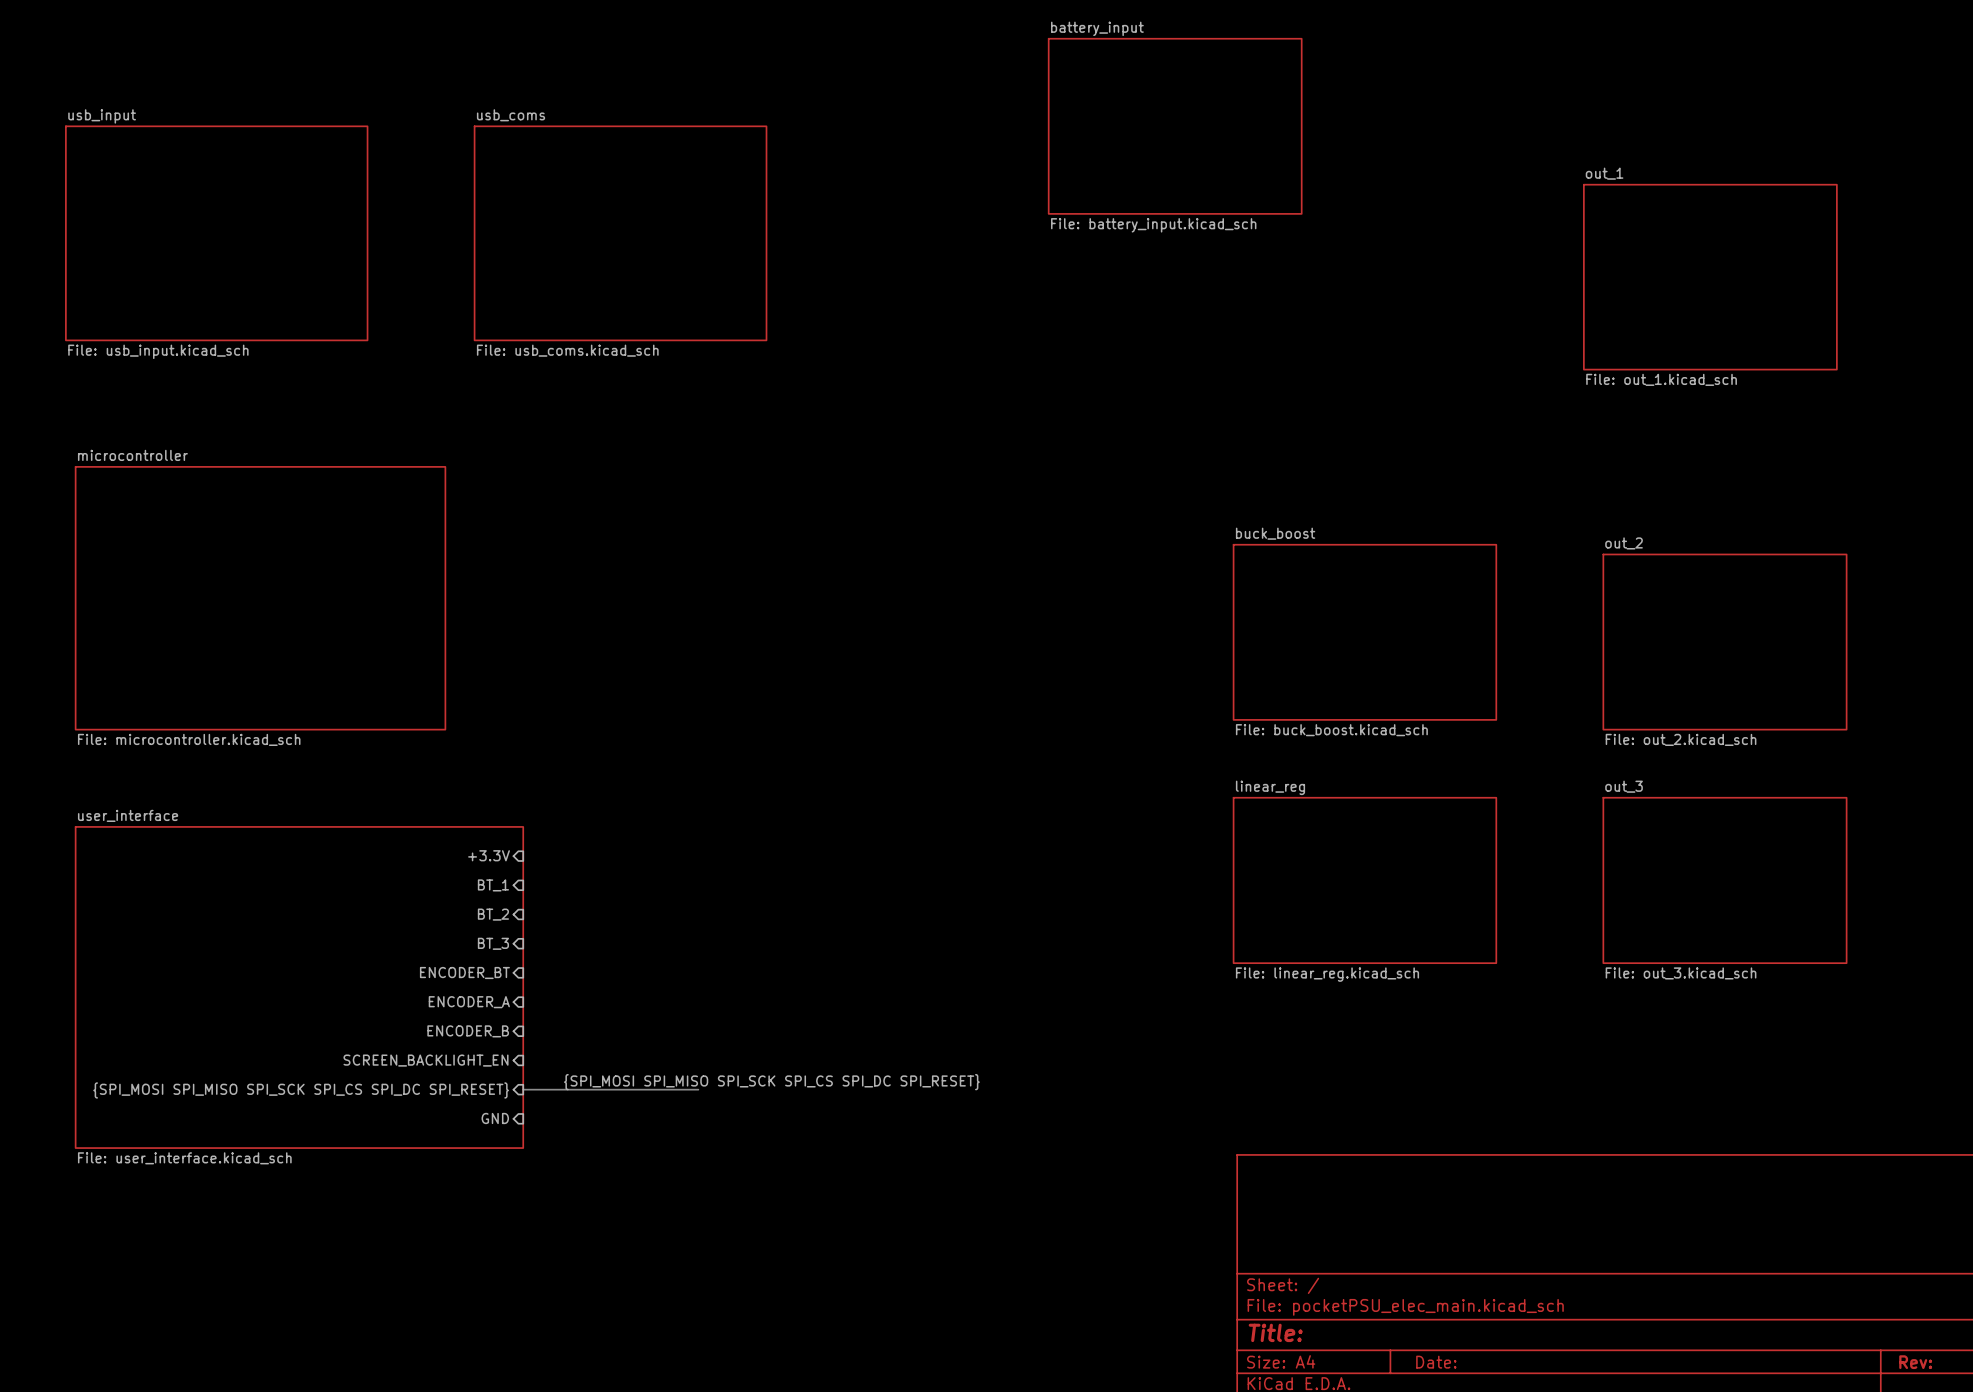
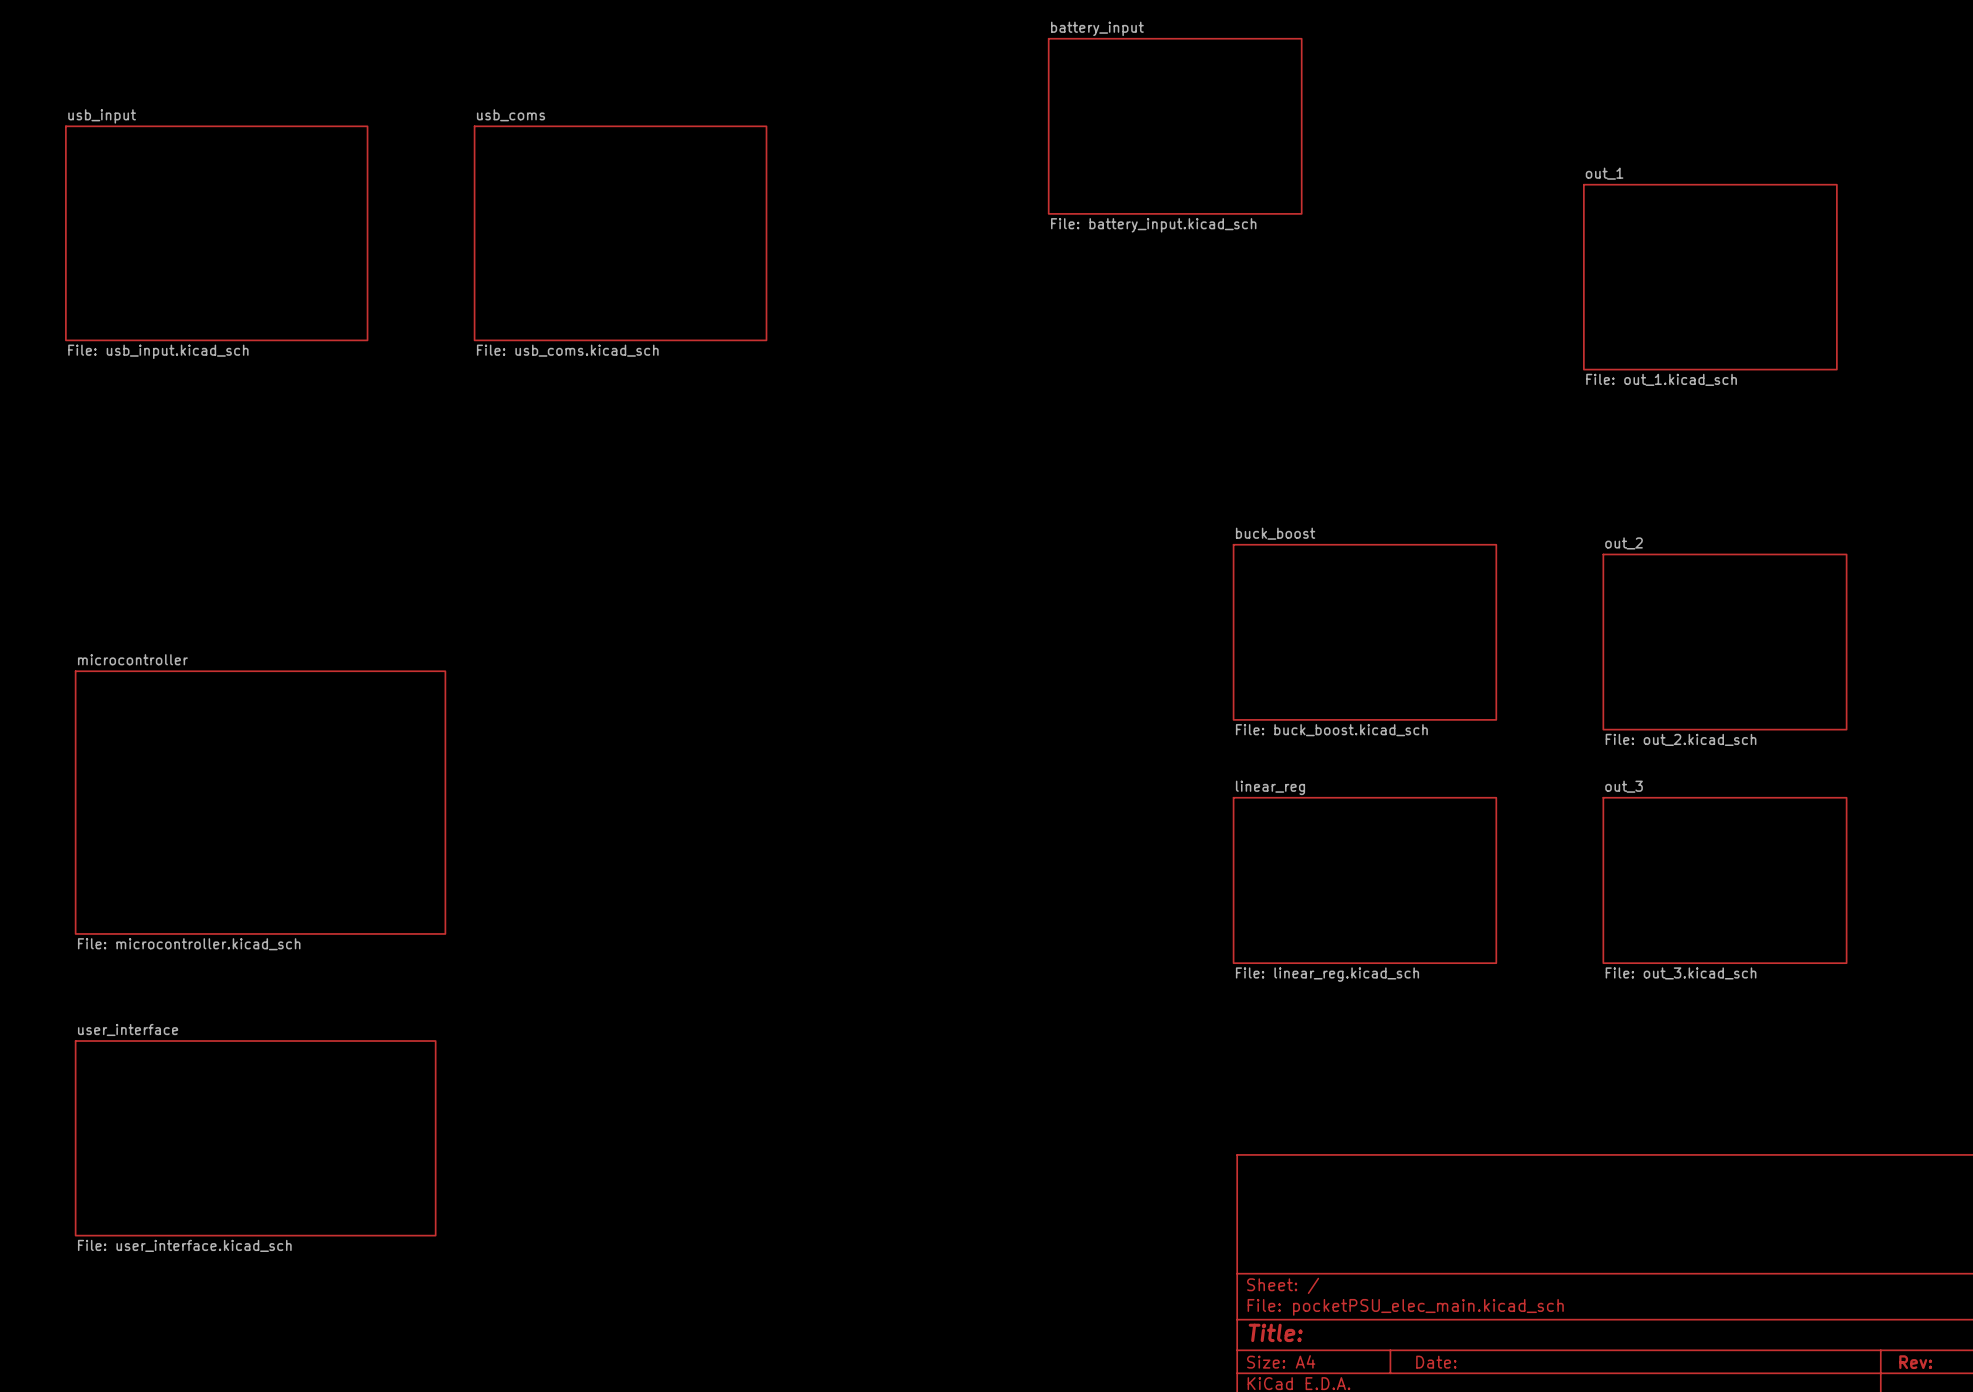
sheet microcontroller: File: microcontroller.kicad_sch (260, 598) -> none
sheet microcontroller: none -> File: microcontroller.kicad_sch (260, 802)
sheet pin: +3.3V (489, 855) -> none
sheet pin: BT_1 (493, 885) -> none
sheet pin: BT_2 (493, 914) -> none
sheet pin: BT_3 (493, 943) -> none
sheet pin: ENCODER_BT (464, 972) -> none
sheet user_interface: File: user_interface.kicad_sch (299, 987) -> none
sheet pin: ENCODER_A (469, 1002) -> none
sheet pin: ENCODER_B (468, 1031) -> none
sheet pin: SCREEN_BACKLIGHT_EN (426, 1060) -> none
label: {SPI_MOSI SPI_MISO SPI_SCK SPI_CS SPI_DC SPI_RESET} (771, 1082) -> none
bus: (523, 1089) (698, 1089) -> none
sheet pin: {SPI_MOSI SPI_MISO SPI_SCK SPI_CS SPI_DC SPI_RESET} (301, 1090) -> none
sheet pin: GND (495, 1118) -> none
sheet user_interface: none -> File: user_interface.kicad_sch (255, 1138)

